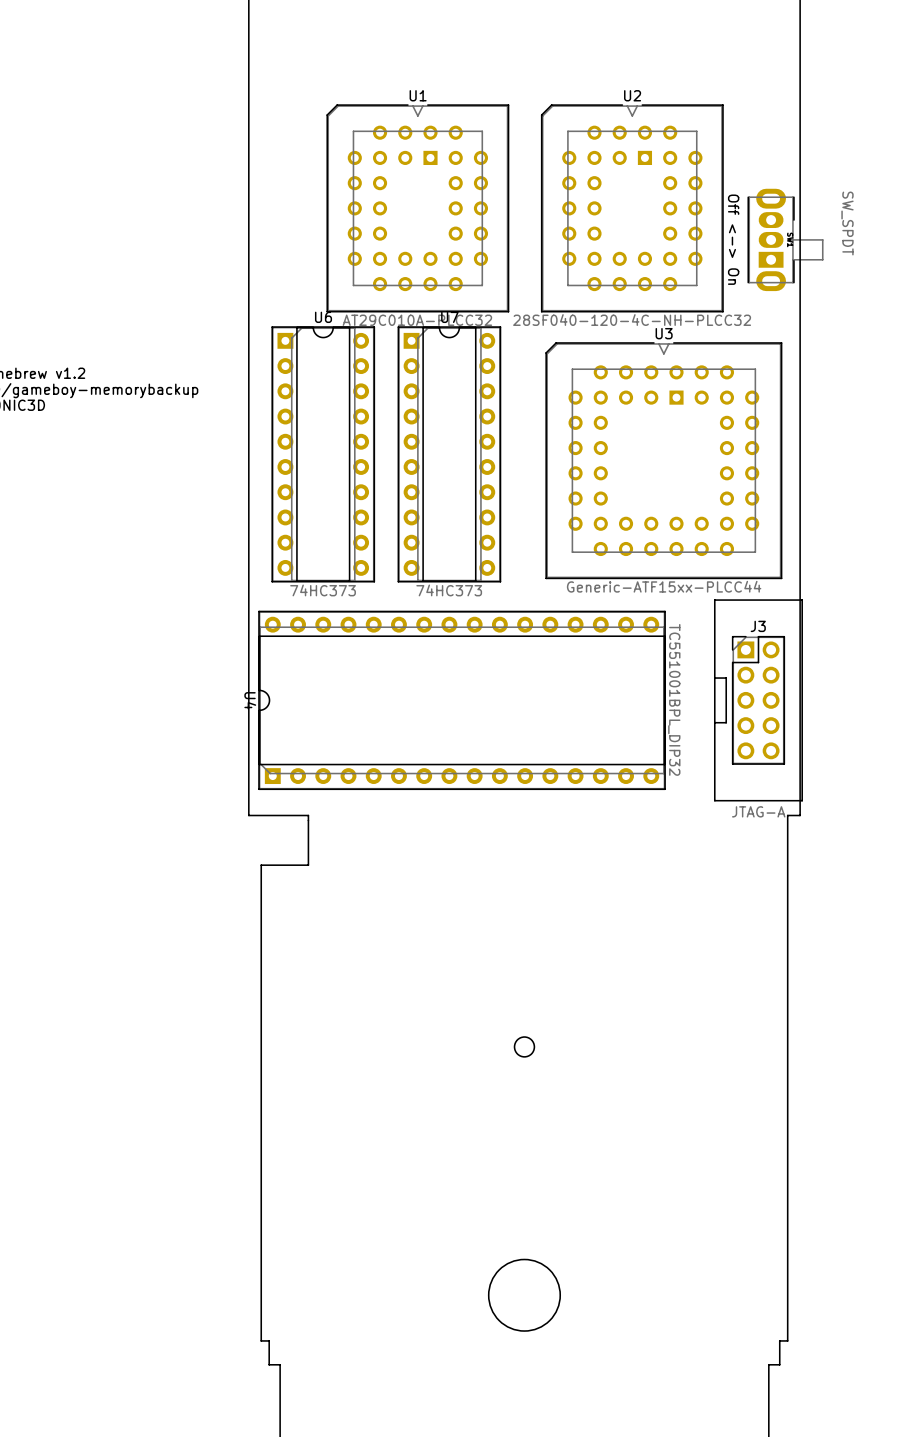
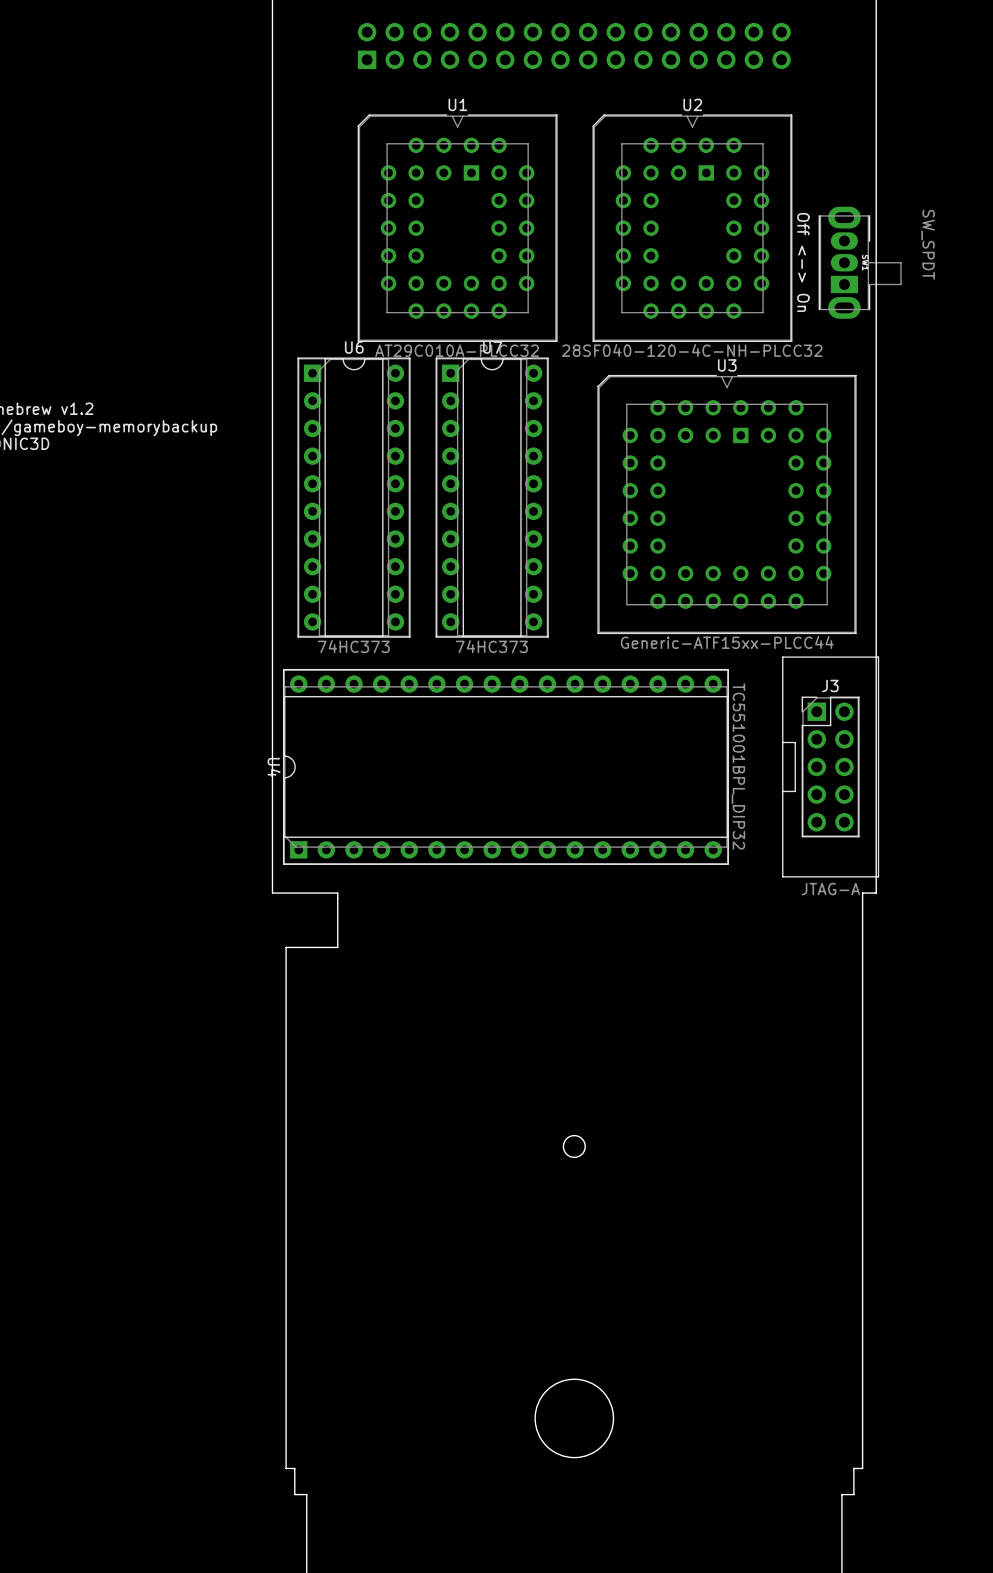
part: none -> (574, 46)

